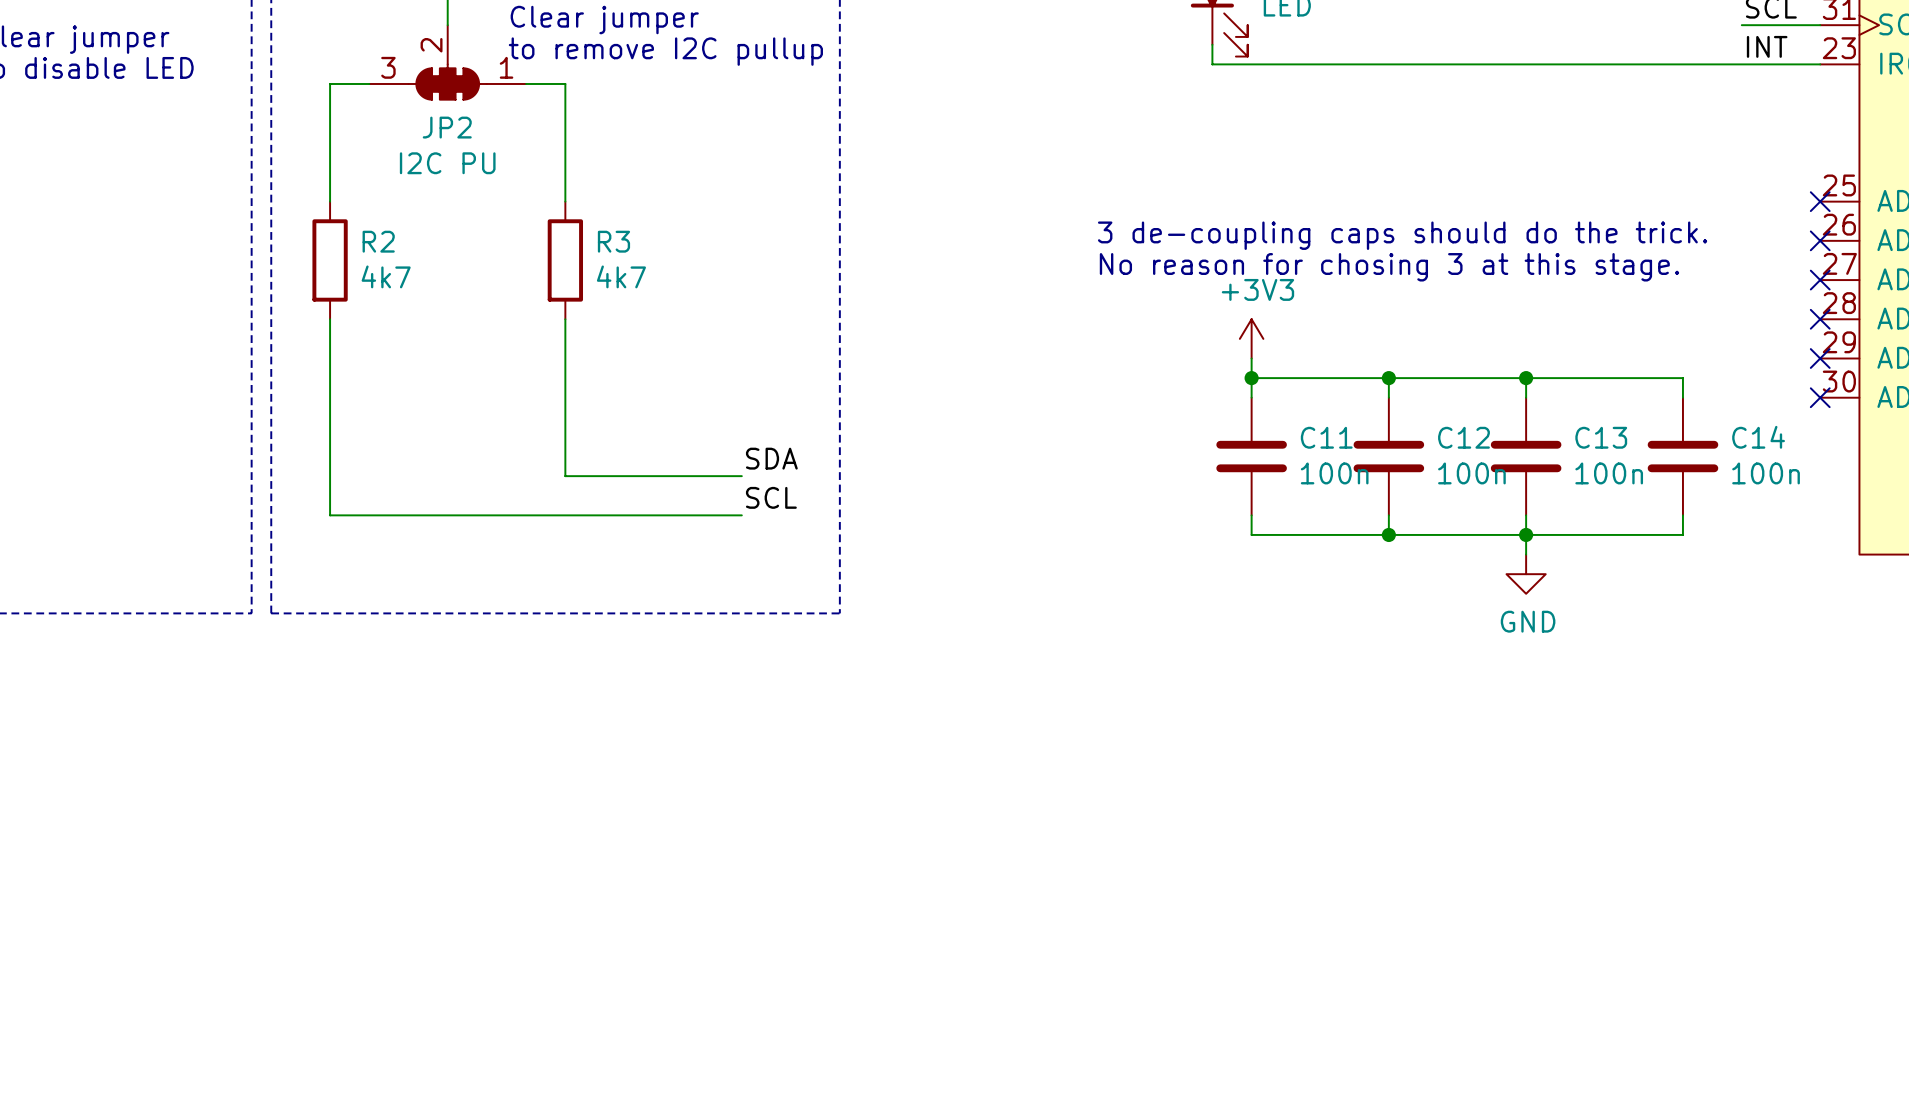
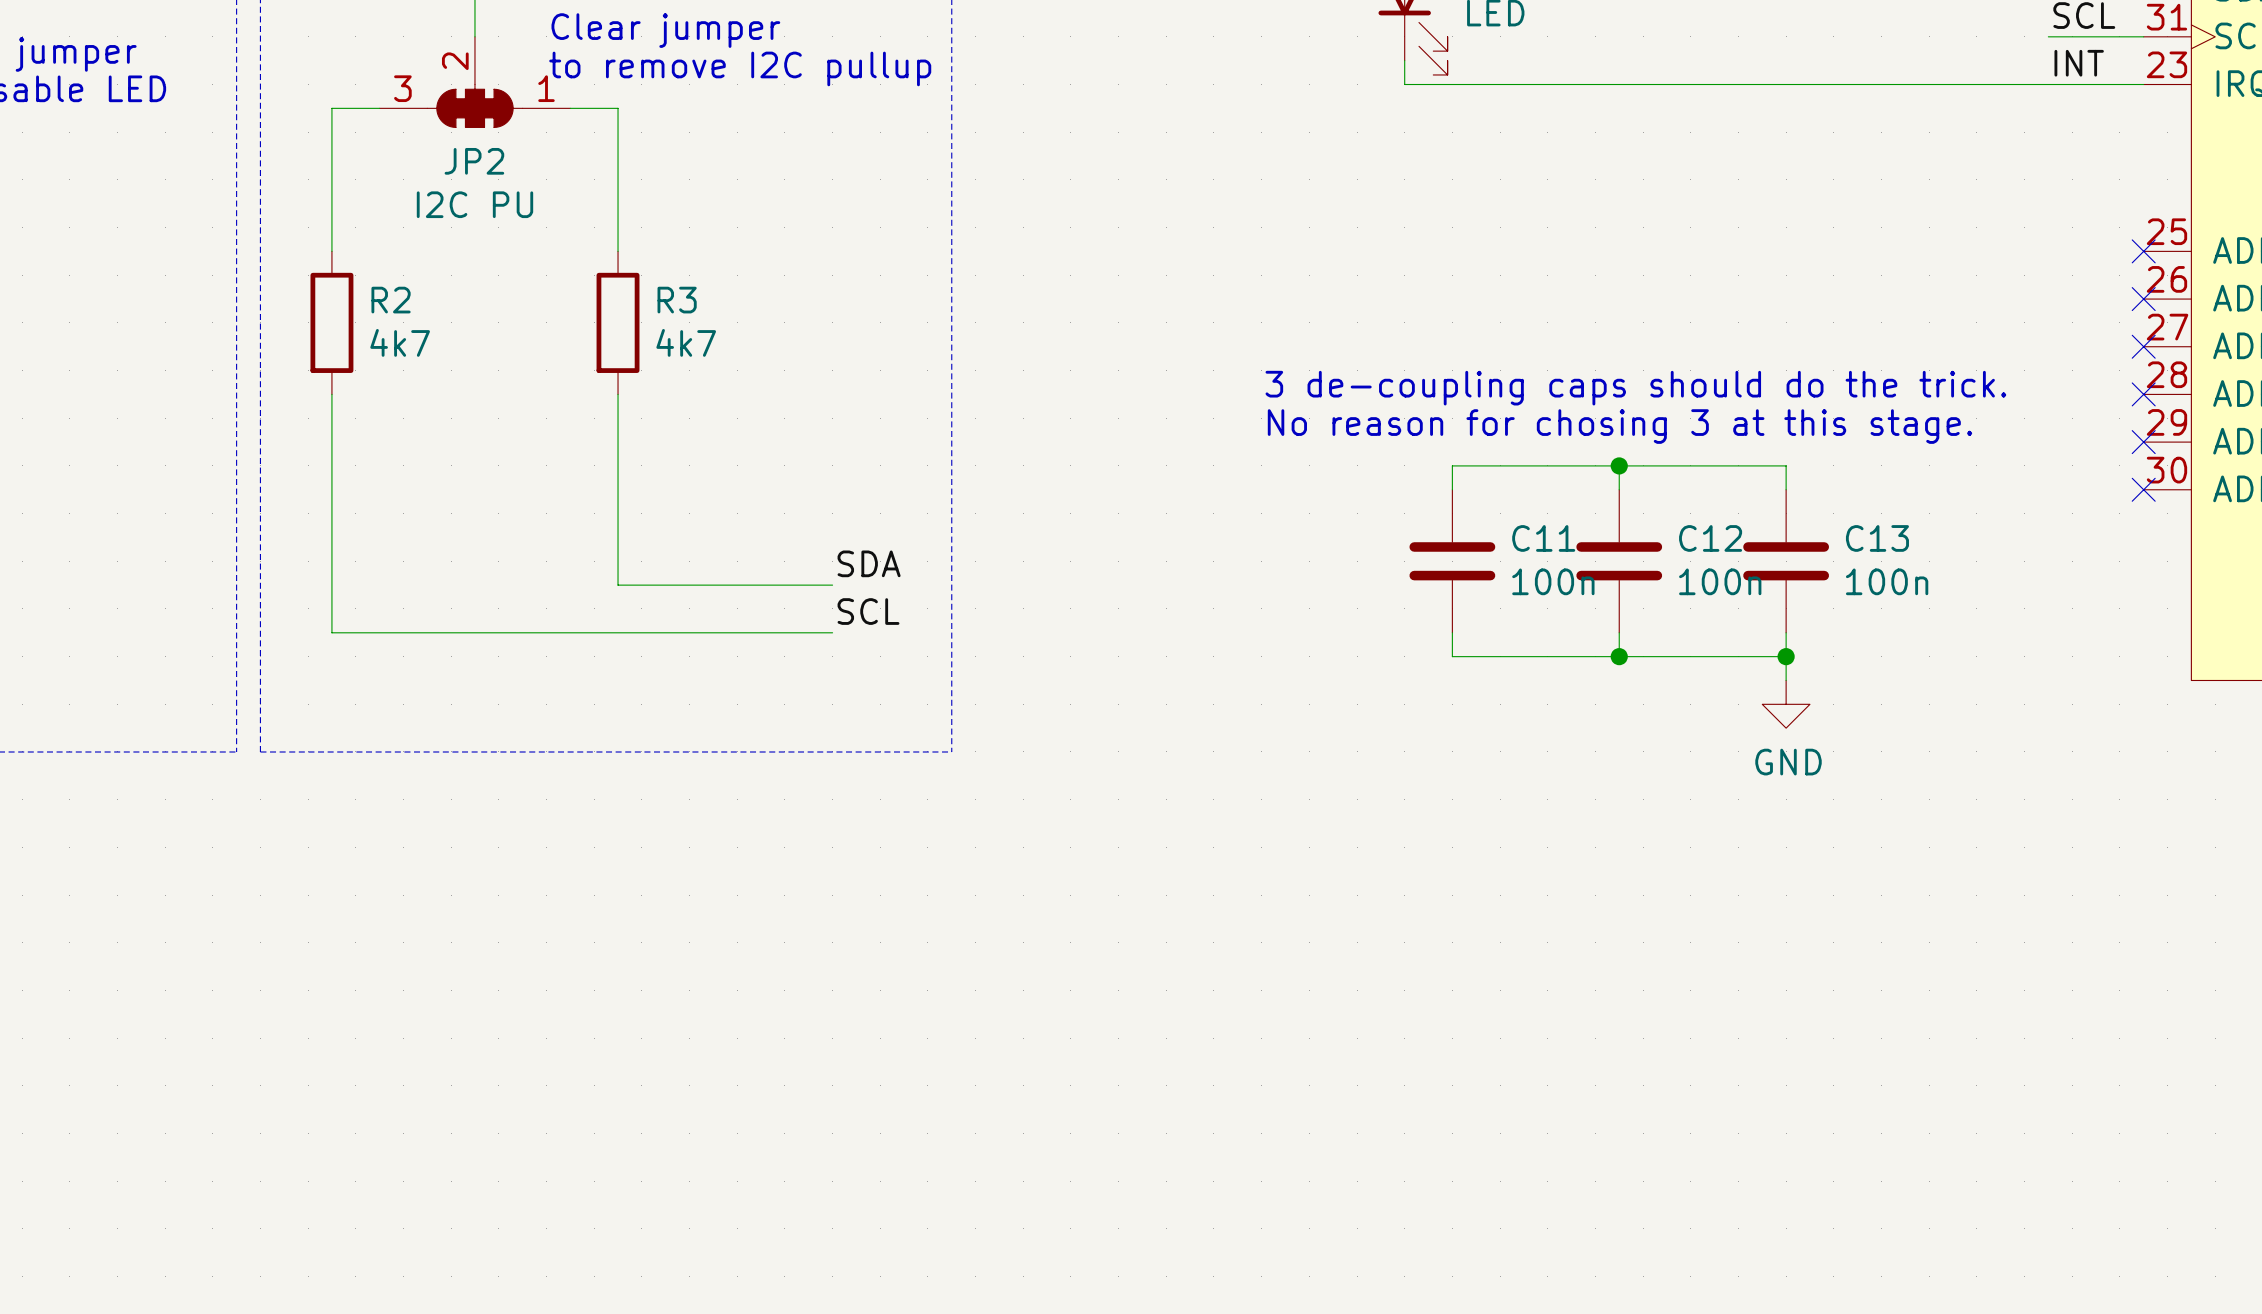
text position: 3 de-coupling caps should do the trick. (1402, 235) -> 3 de-coupling caps should do the trick. (1635, 388)
text position: No reason for chosing 3 at this stage. (1389, 267) -> No reason for chosing 3 at this stage. (1619, 426)
power symbol: +3V3 (1251, 338) -> none
wire: (1251, 358) (1251, 378) -> none
junction: (1251, 378) -> none
wire: (1526, 378) (1682, 378) (1682, 397) -> none
junction: (1526, 378) -> none
C14: 100n (1682, 456) -> none
wire: (1682, 515) (1682, 534) (1526, 534) -> none

